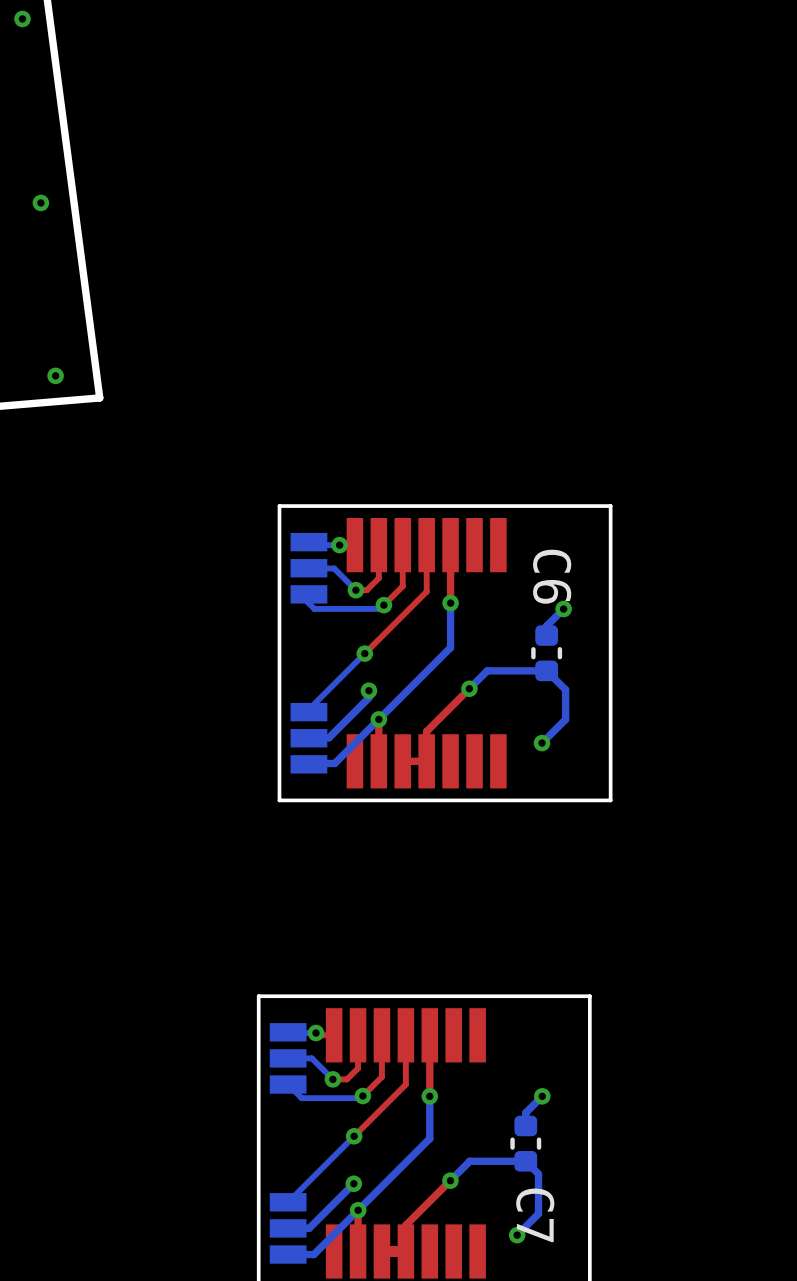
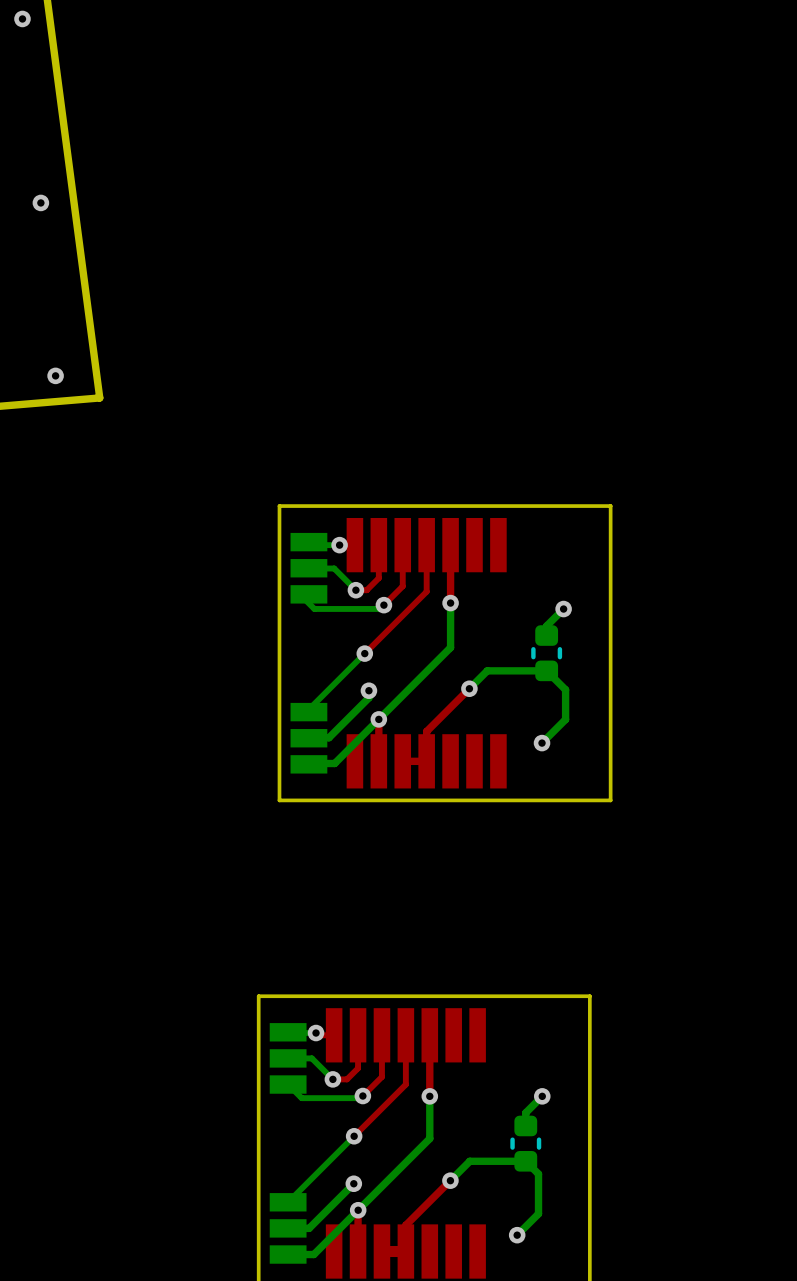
C6 name: C6 (552, 576) -> none
C7 name: C7 (535, 1215) -> none

